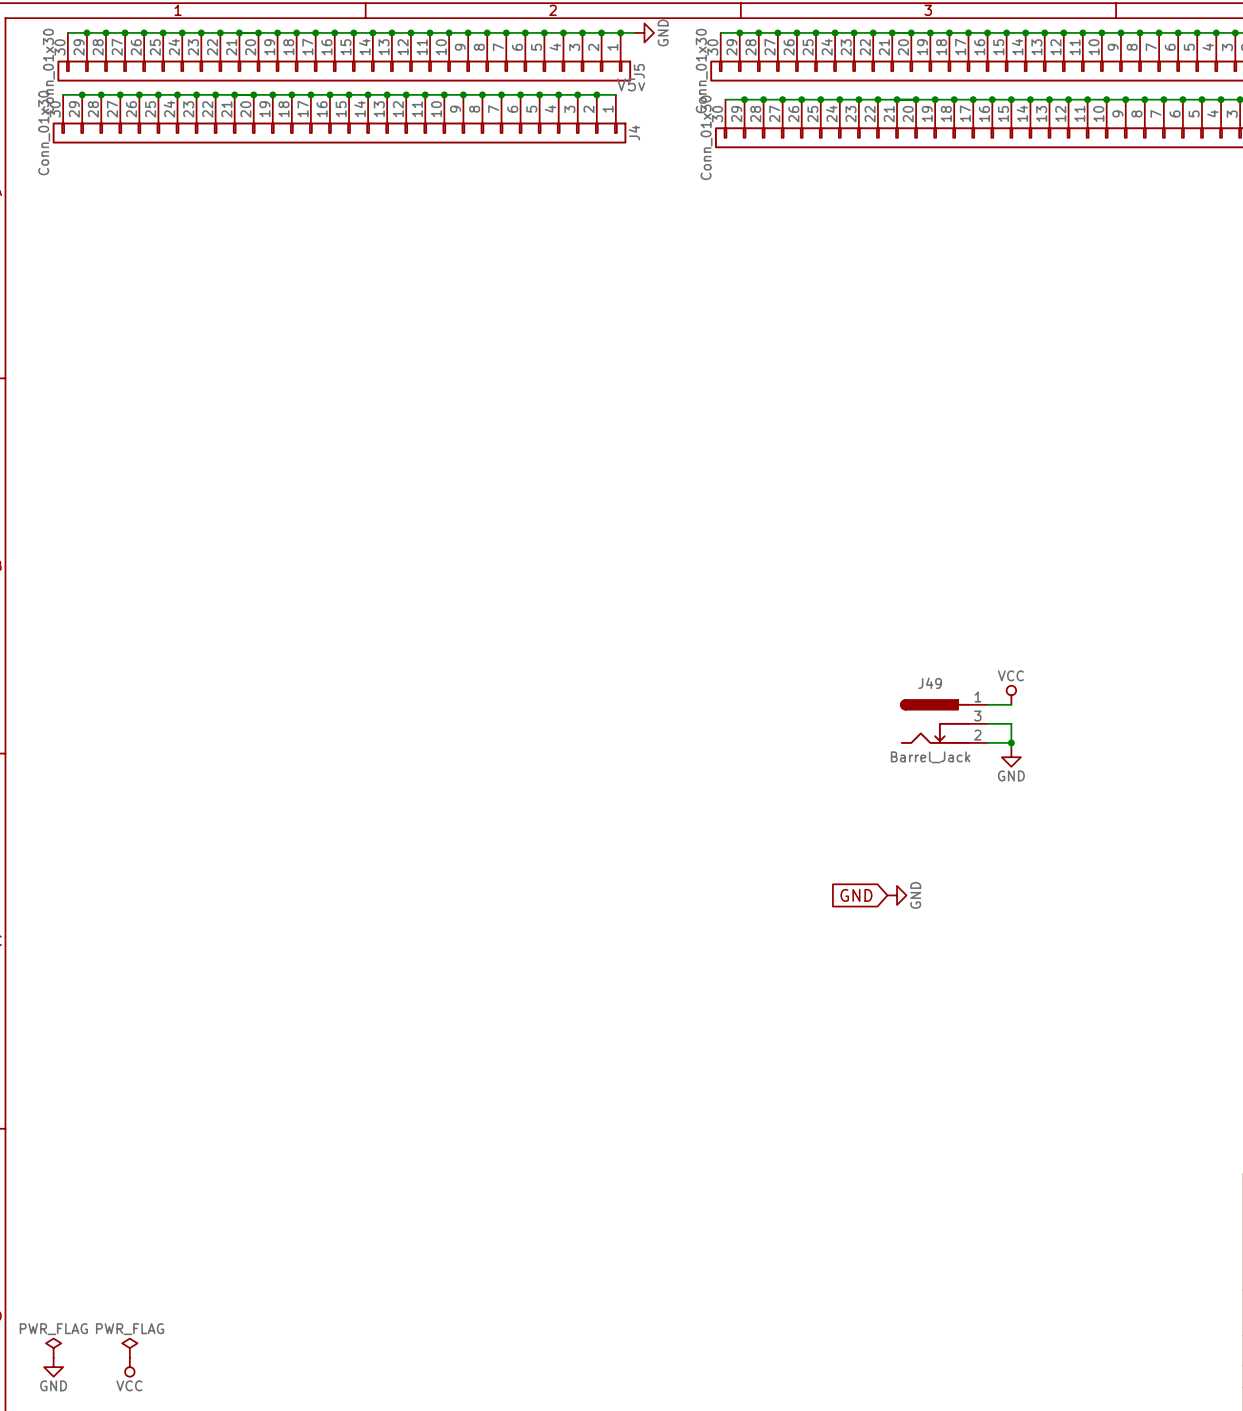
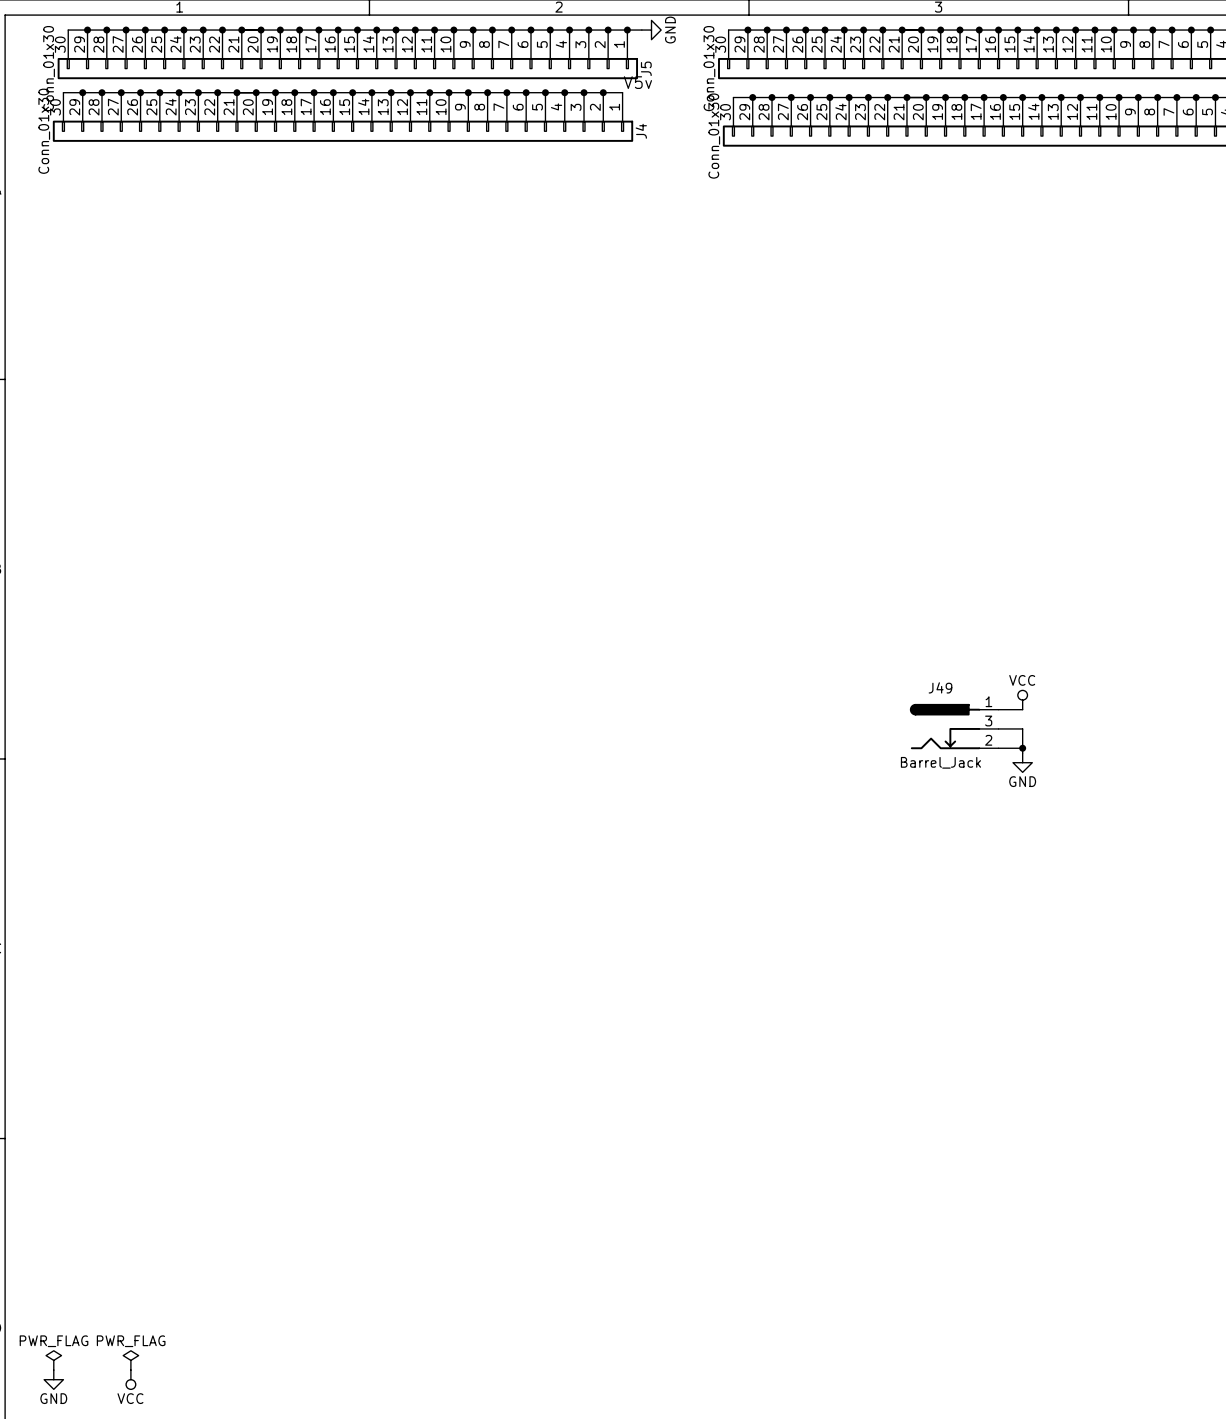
global label: GND (856, 895) -> none
power symbol: GND (897, 895) -> none

